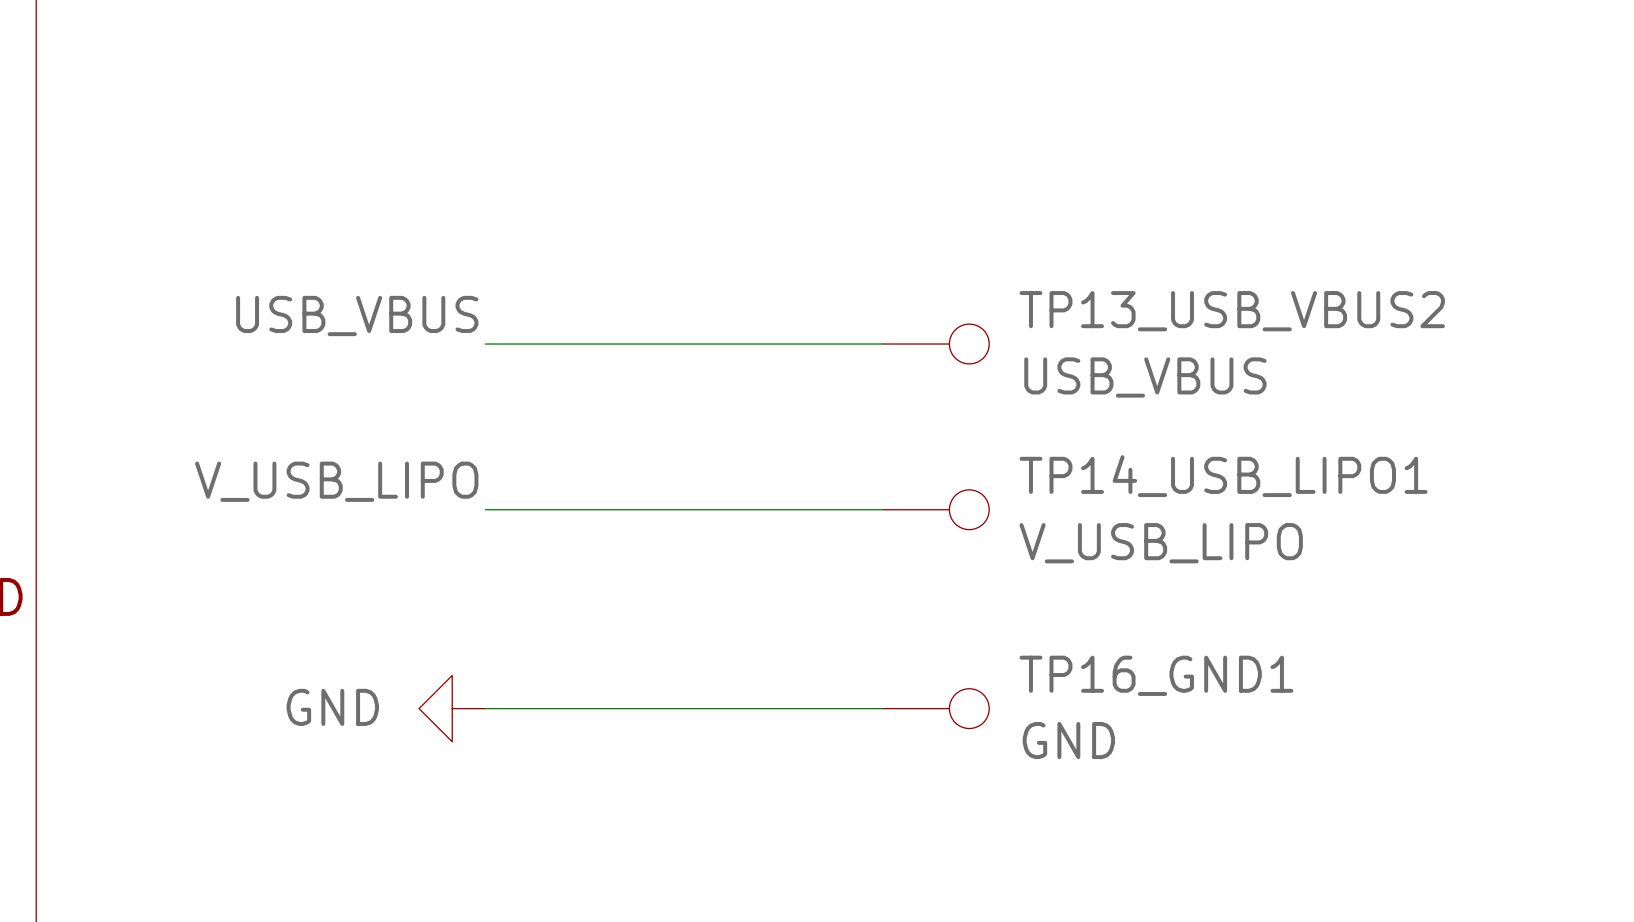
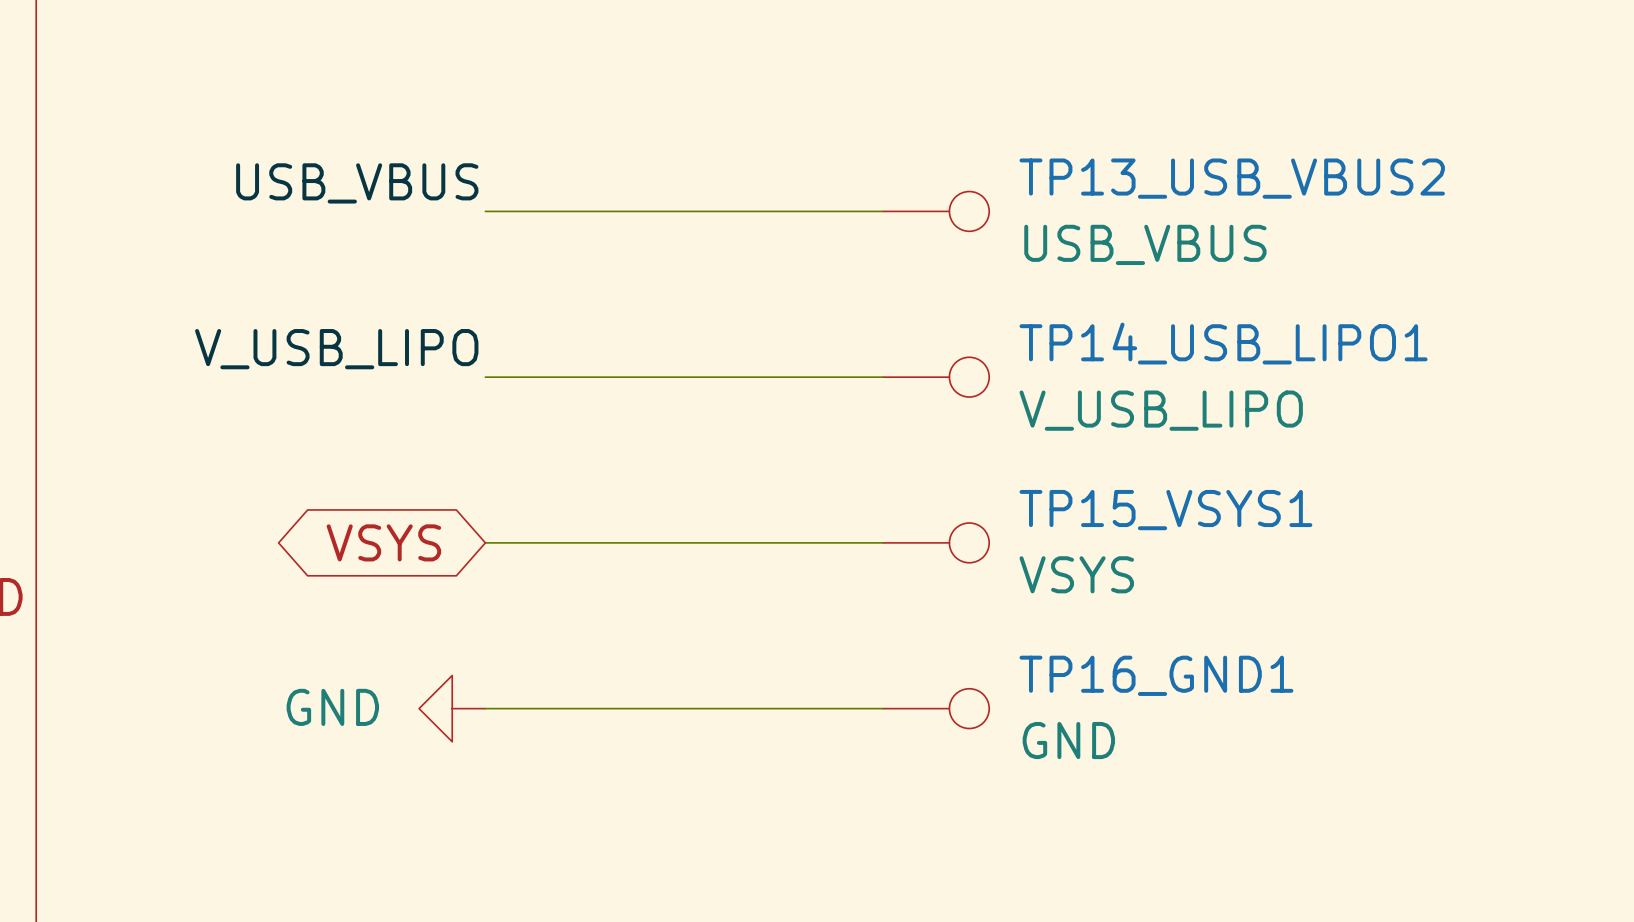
wire: none -> (485, 211) (883, 211)
label position: USB_VBUS (357, 316) -> USB_VBUS (357, 183)
wire: (485, 344) (883, 344) -> (485, 377) (883, 377)
TP13_USB_VBUS2 position: (936, 344) -> (936, 211)
label position: V_USB_LIPO (336, 481) -> V_USB_LIPO (336, 349)
wire: (485, 509) (883, 509) -> (485, 542) (883, 542)
TP14_USB_LIPO1 position: (936, 509) -> (936, 377)
global label: none -> VSYS (383, 542)
TP15_VSYS1: none -> VSYS (936, 542)

